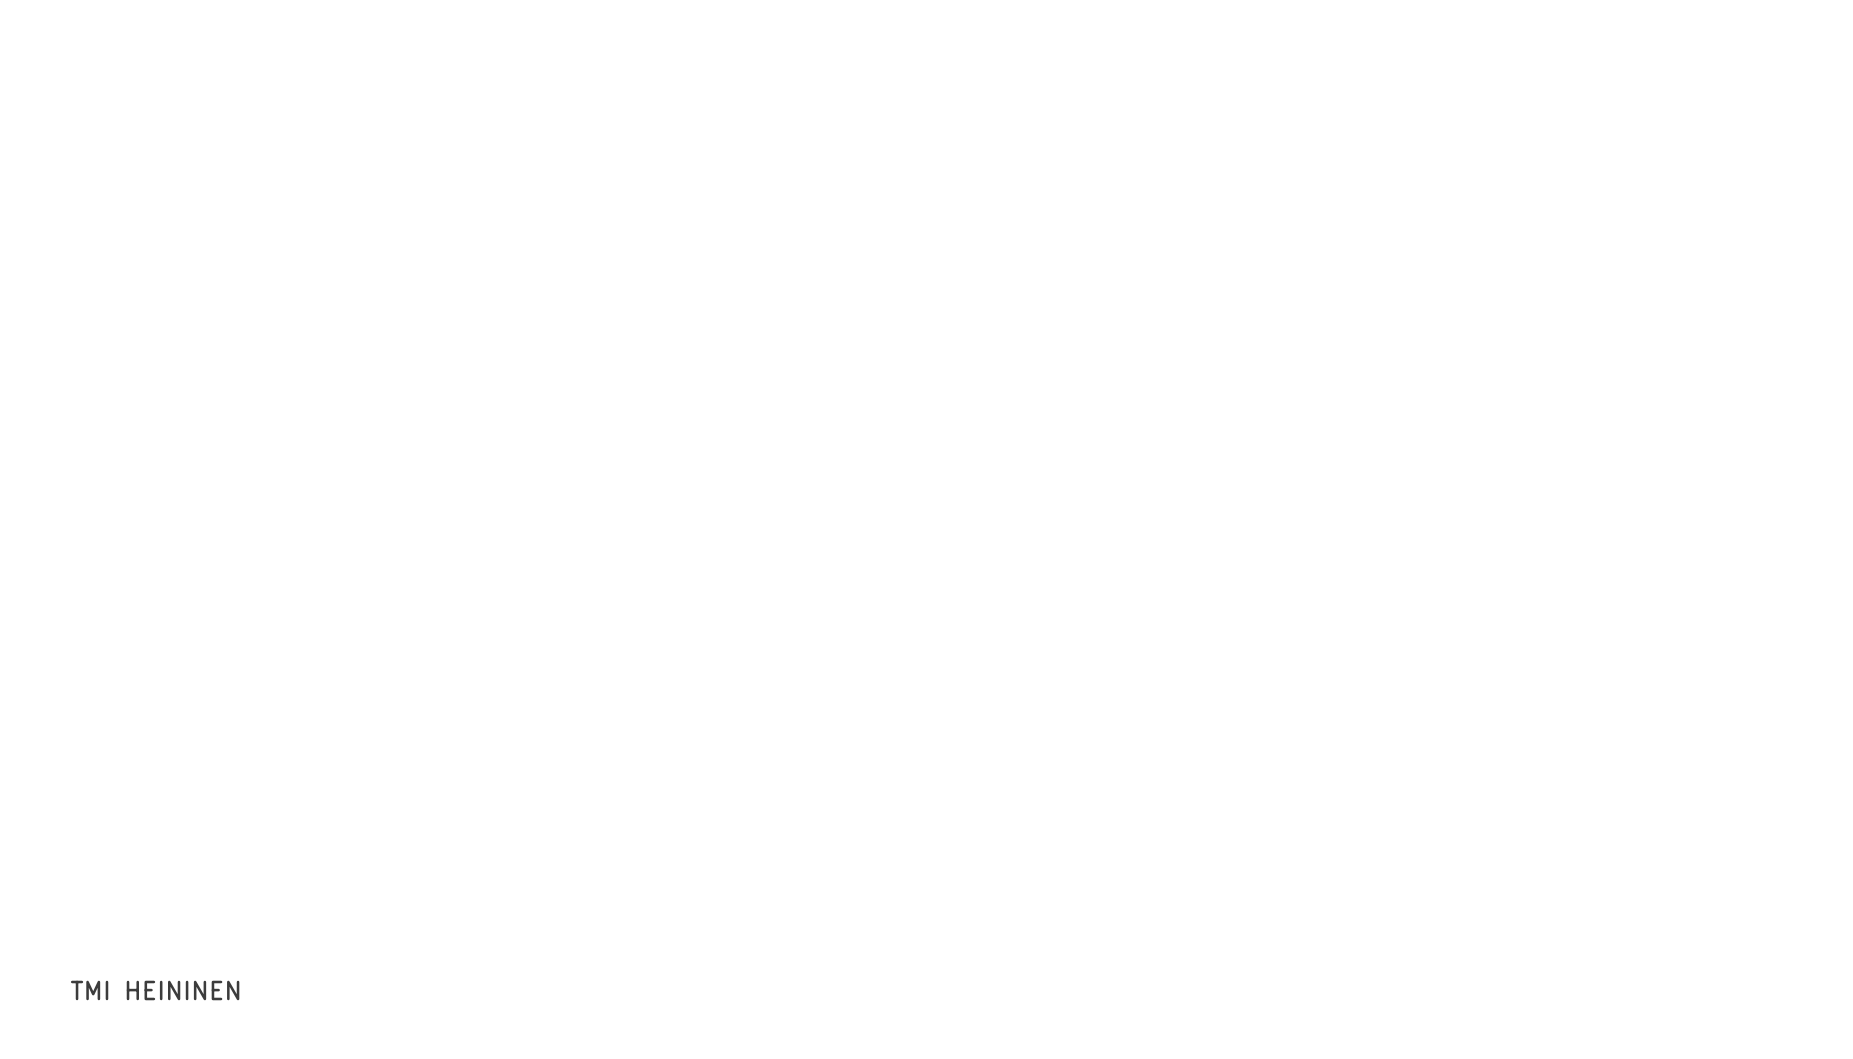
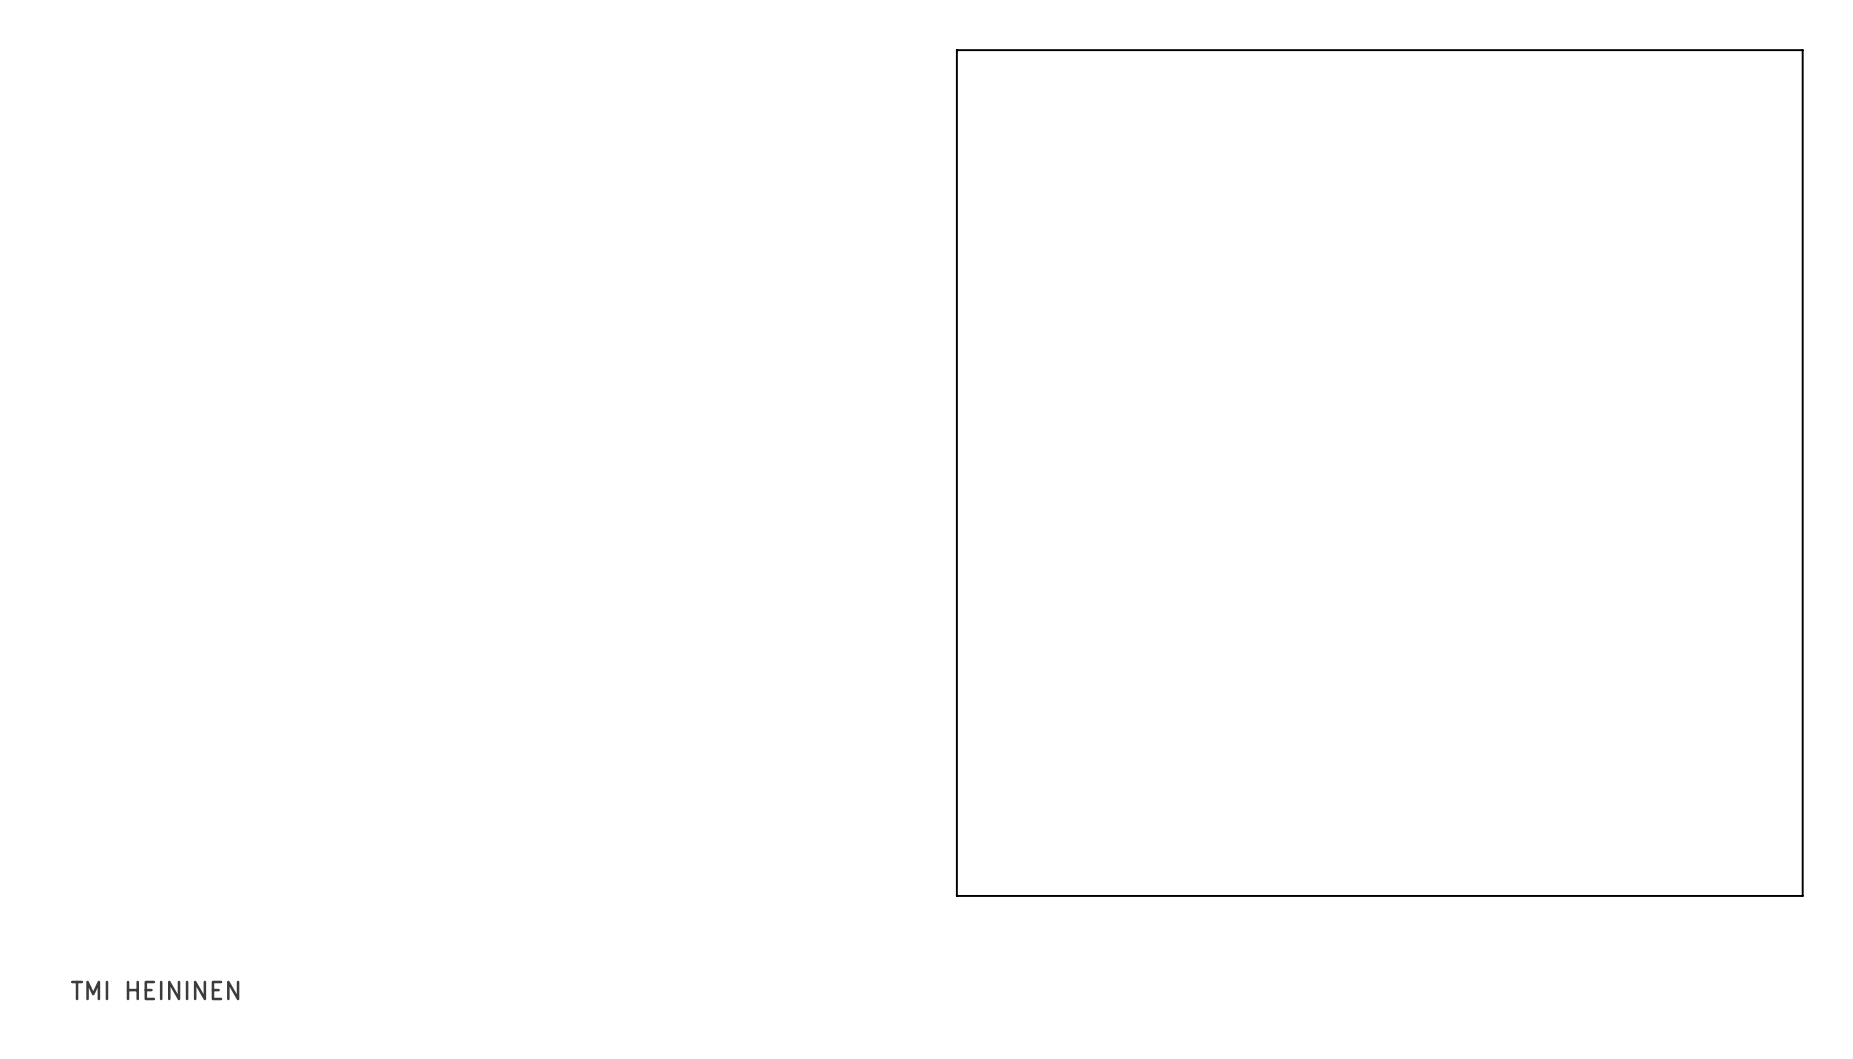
board edge: none -> (956, 50) (1802, 50) (1802, 895) (956, 895) (956, 50)

